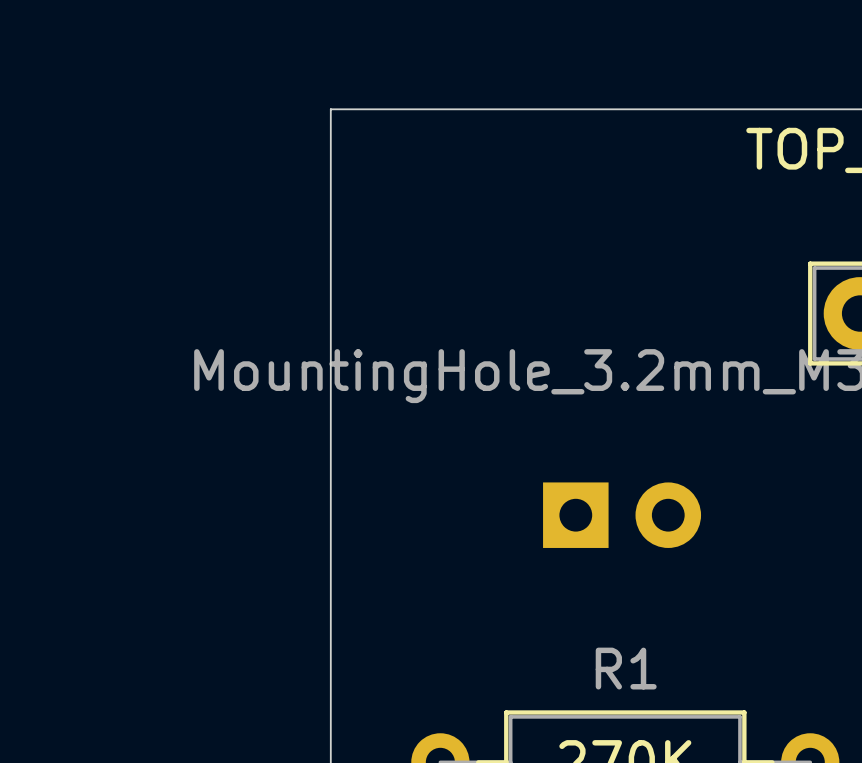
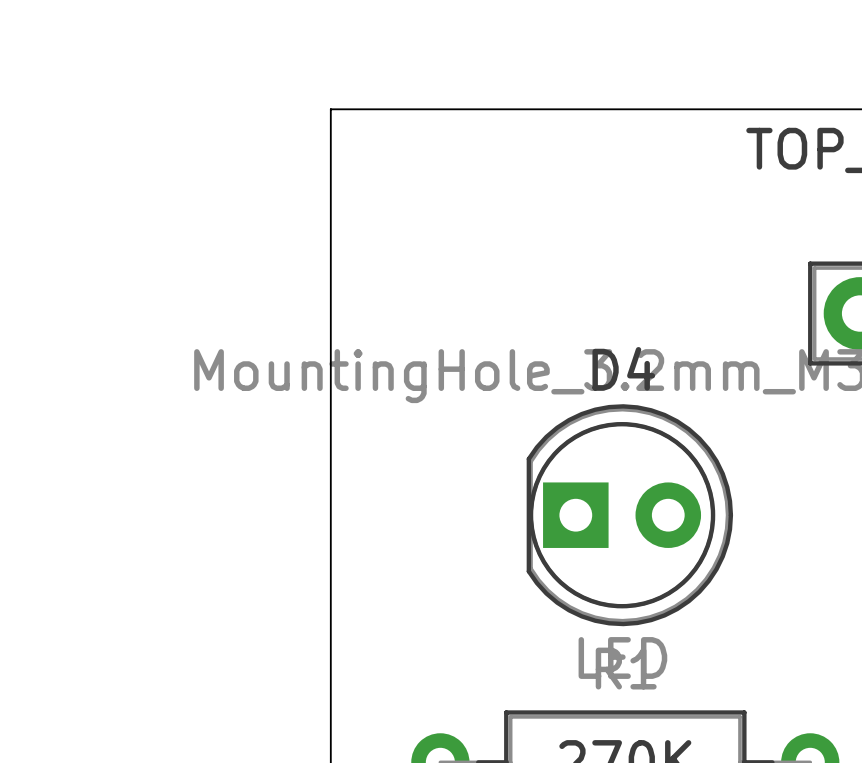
D4 side: bottom (622, 515) -> top (629, 515)

